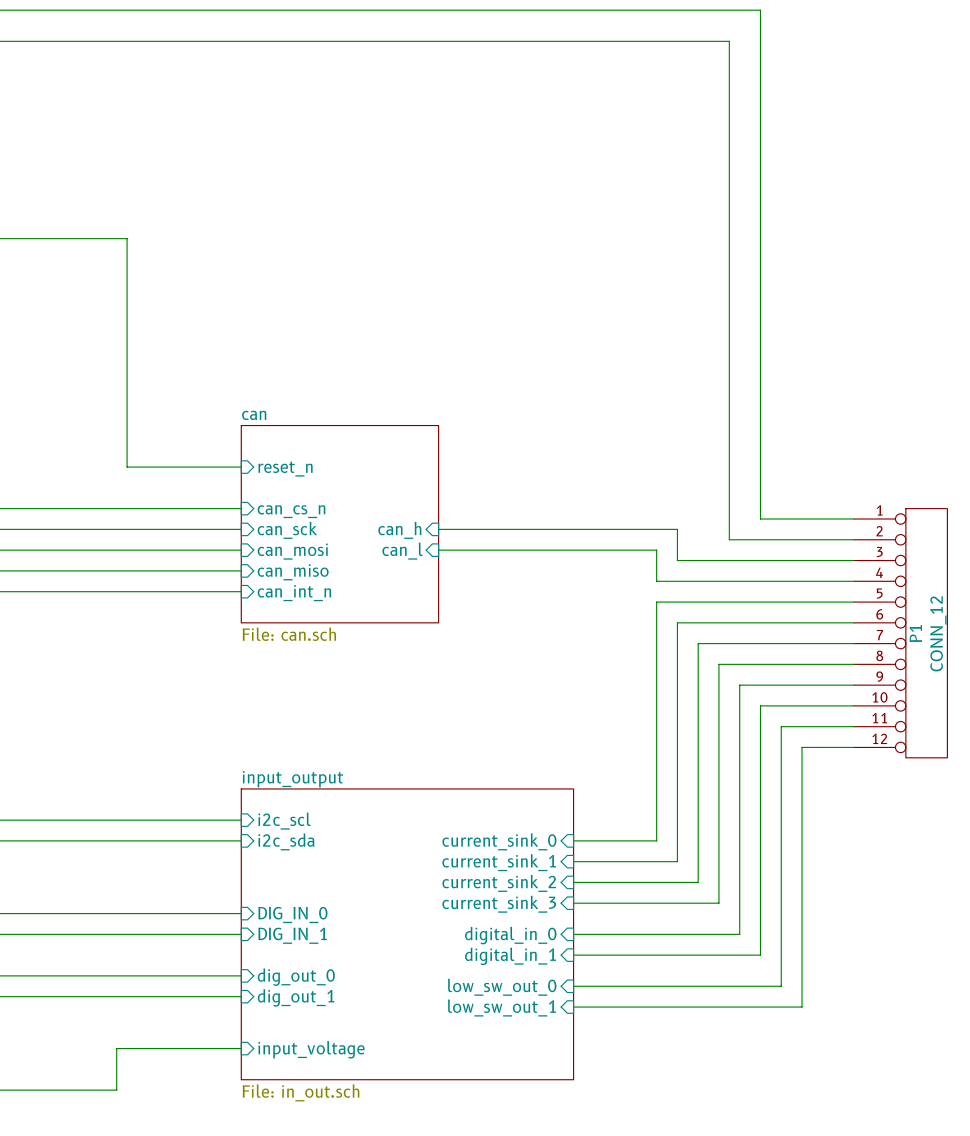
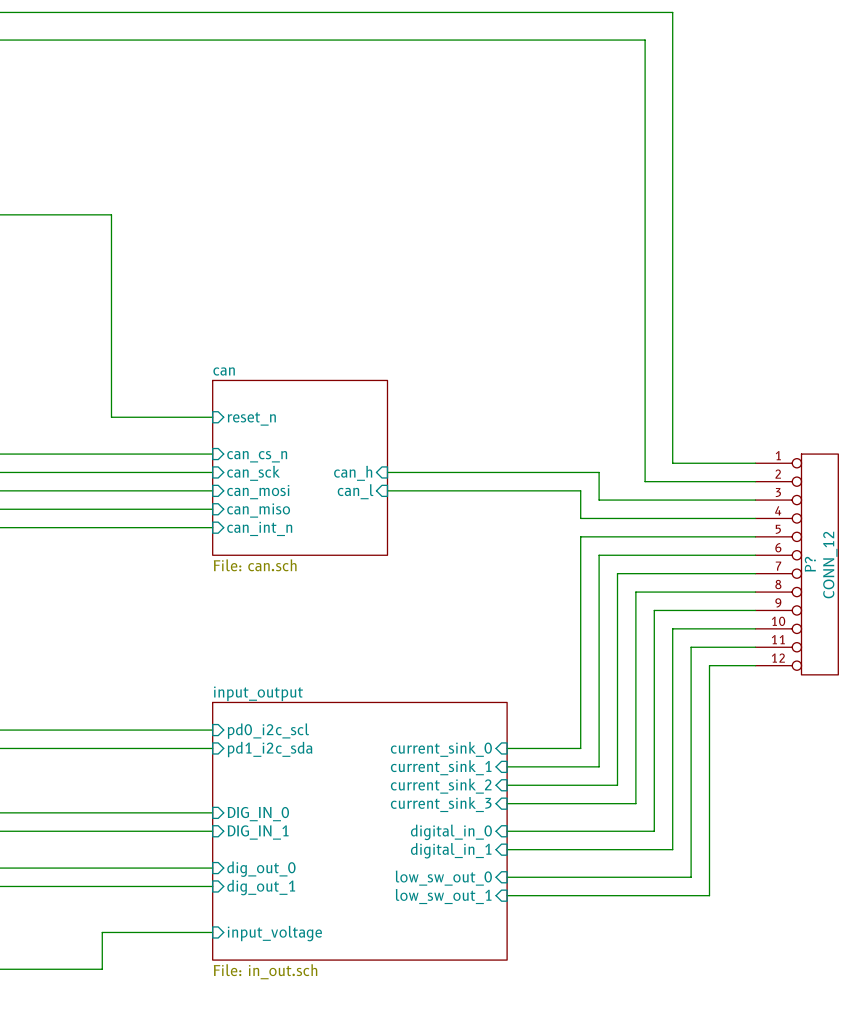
P1 name: P1 (915, 633) -> P? (810, 564)
sheet pin: i2c_scl (284, 821) -> pd0_i2c_scl (268, 731)
sheet pin: i2c_sda (286, 841) -> pd1_i2c_sda (270, 749)

